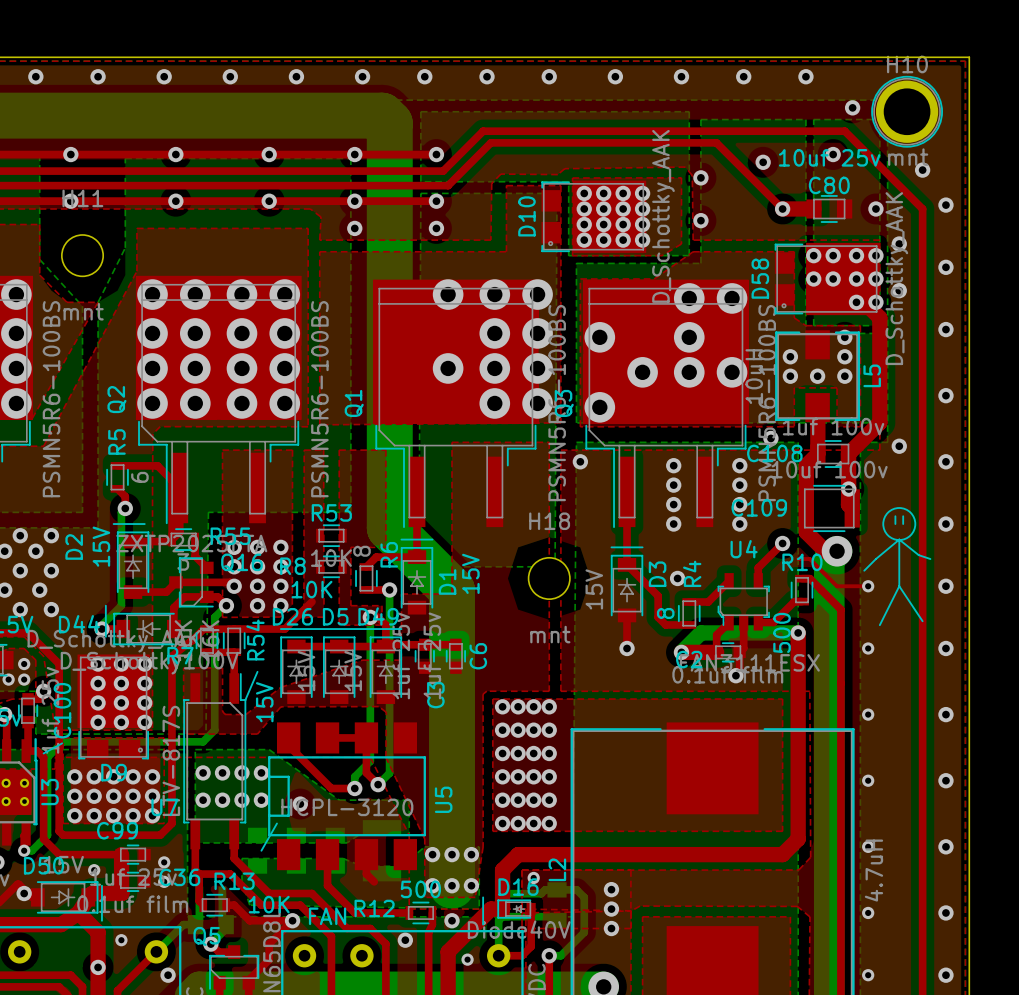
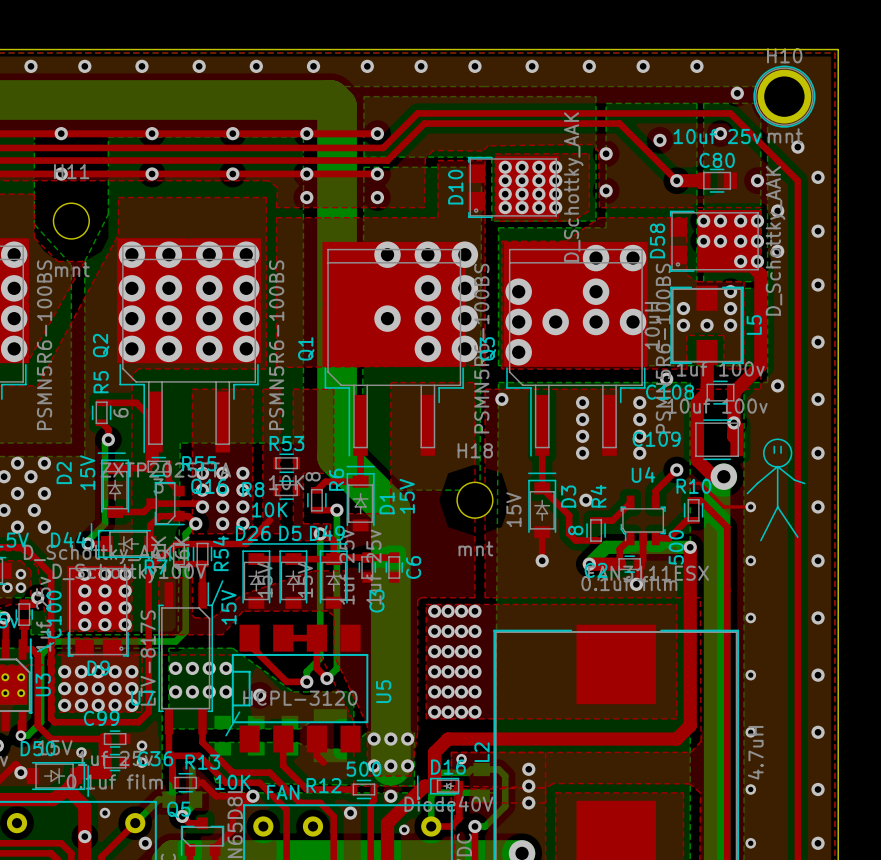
via: none -> (518, 321)

